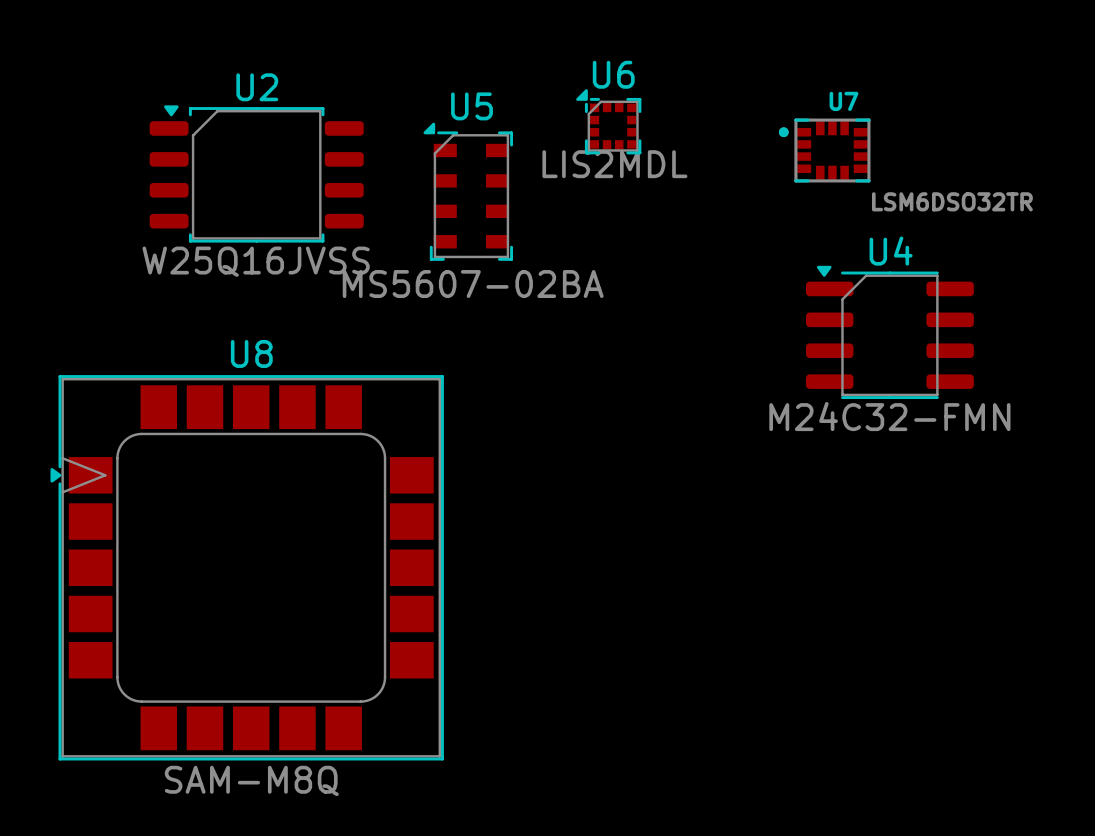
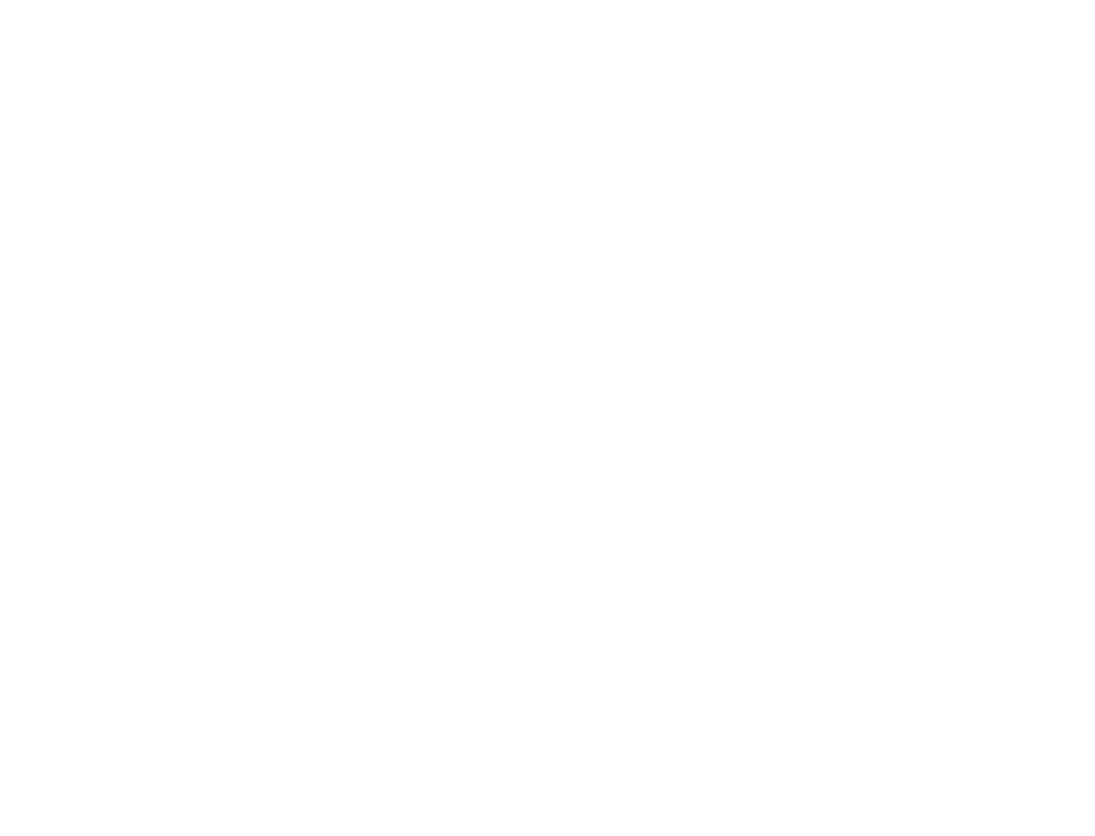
U6: LIS2MDL (608, 121) -> none
U7: LSM6DSO32TR (824, 150) -> none
U2: W25Q16JVSS (256, 173) -> none
U5: MS5607-02BA (468, 191) -> none
U4: M24C32-FMN (889, 332) -> none
U8: SAM-M8Q (247, 567) -> none

